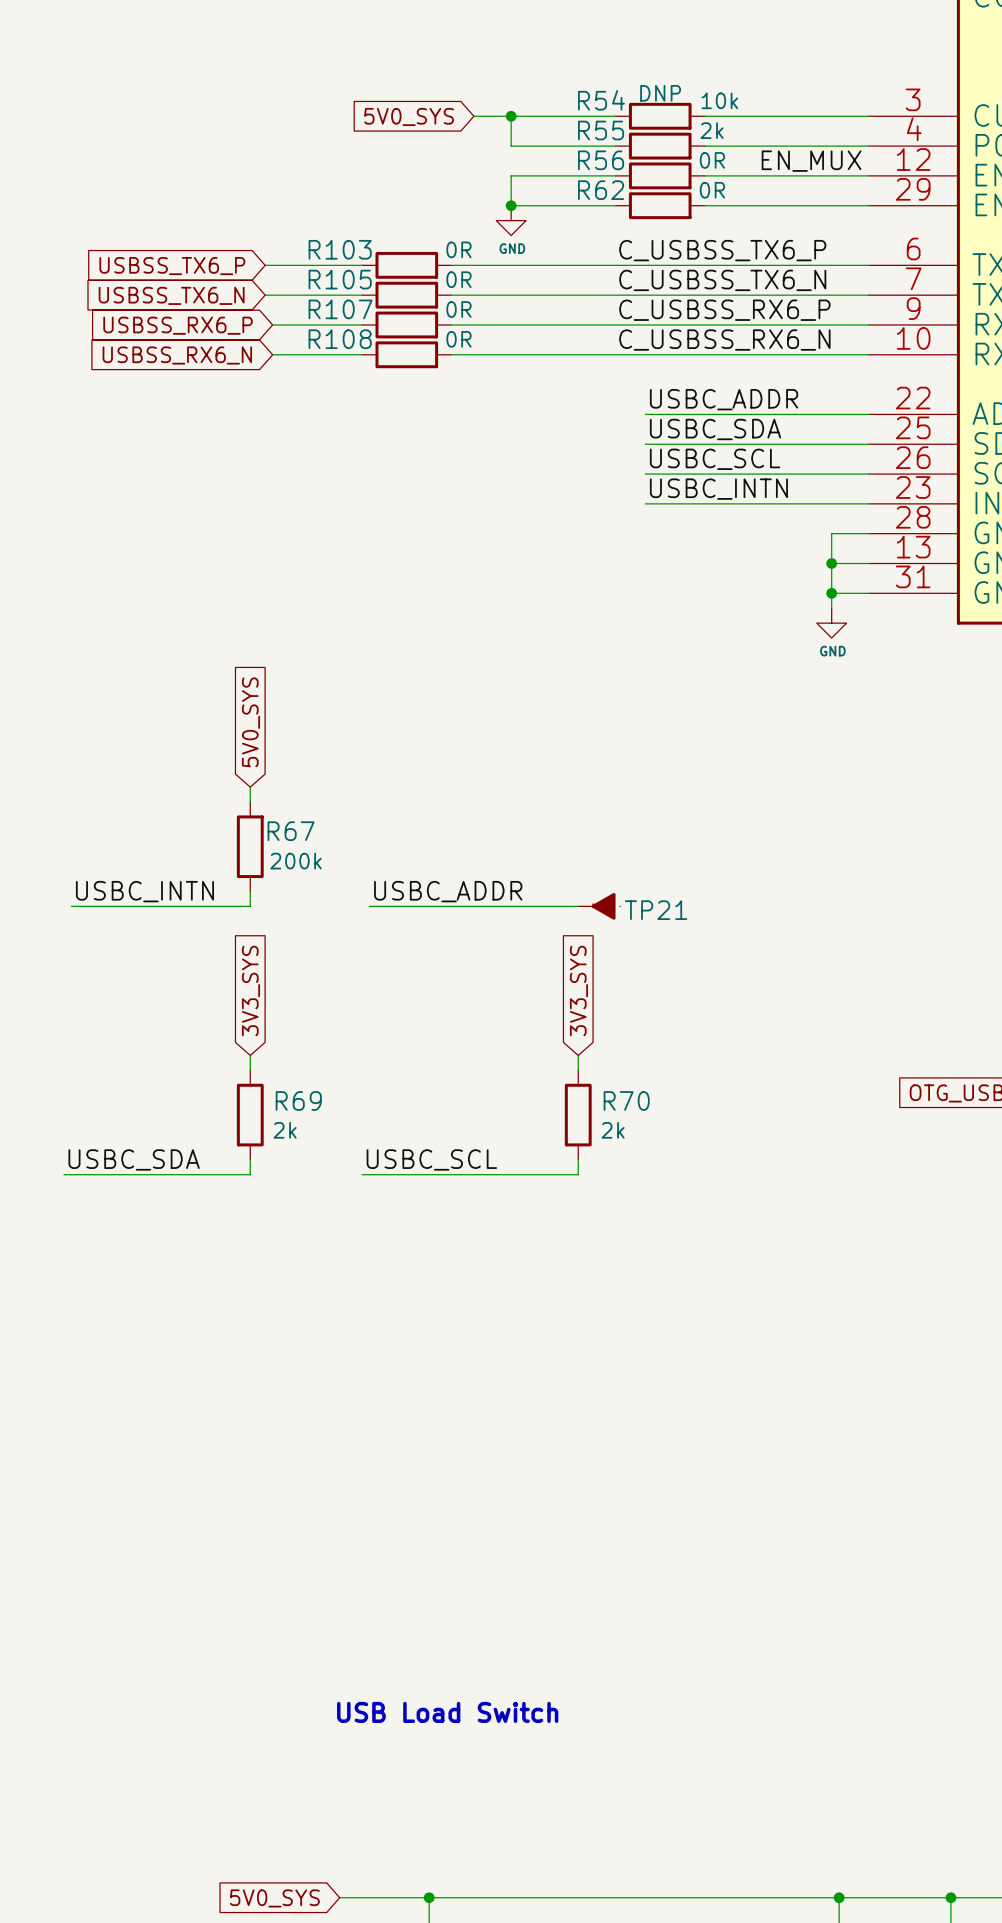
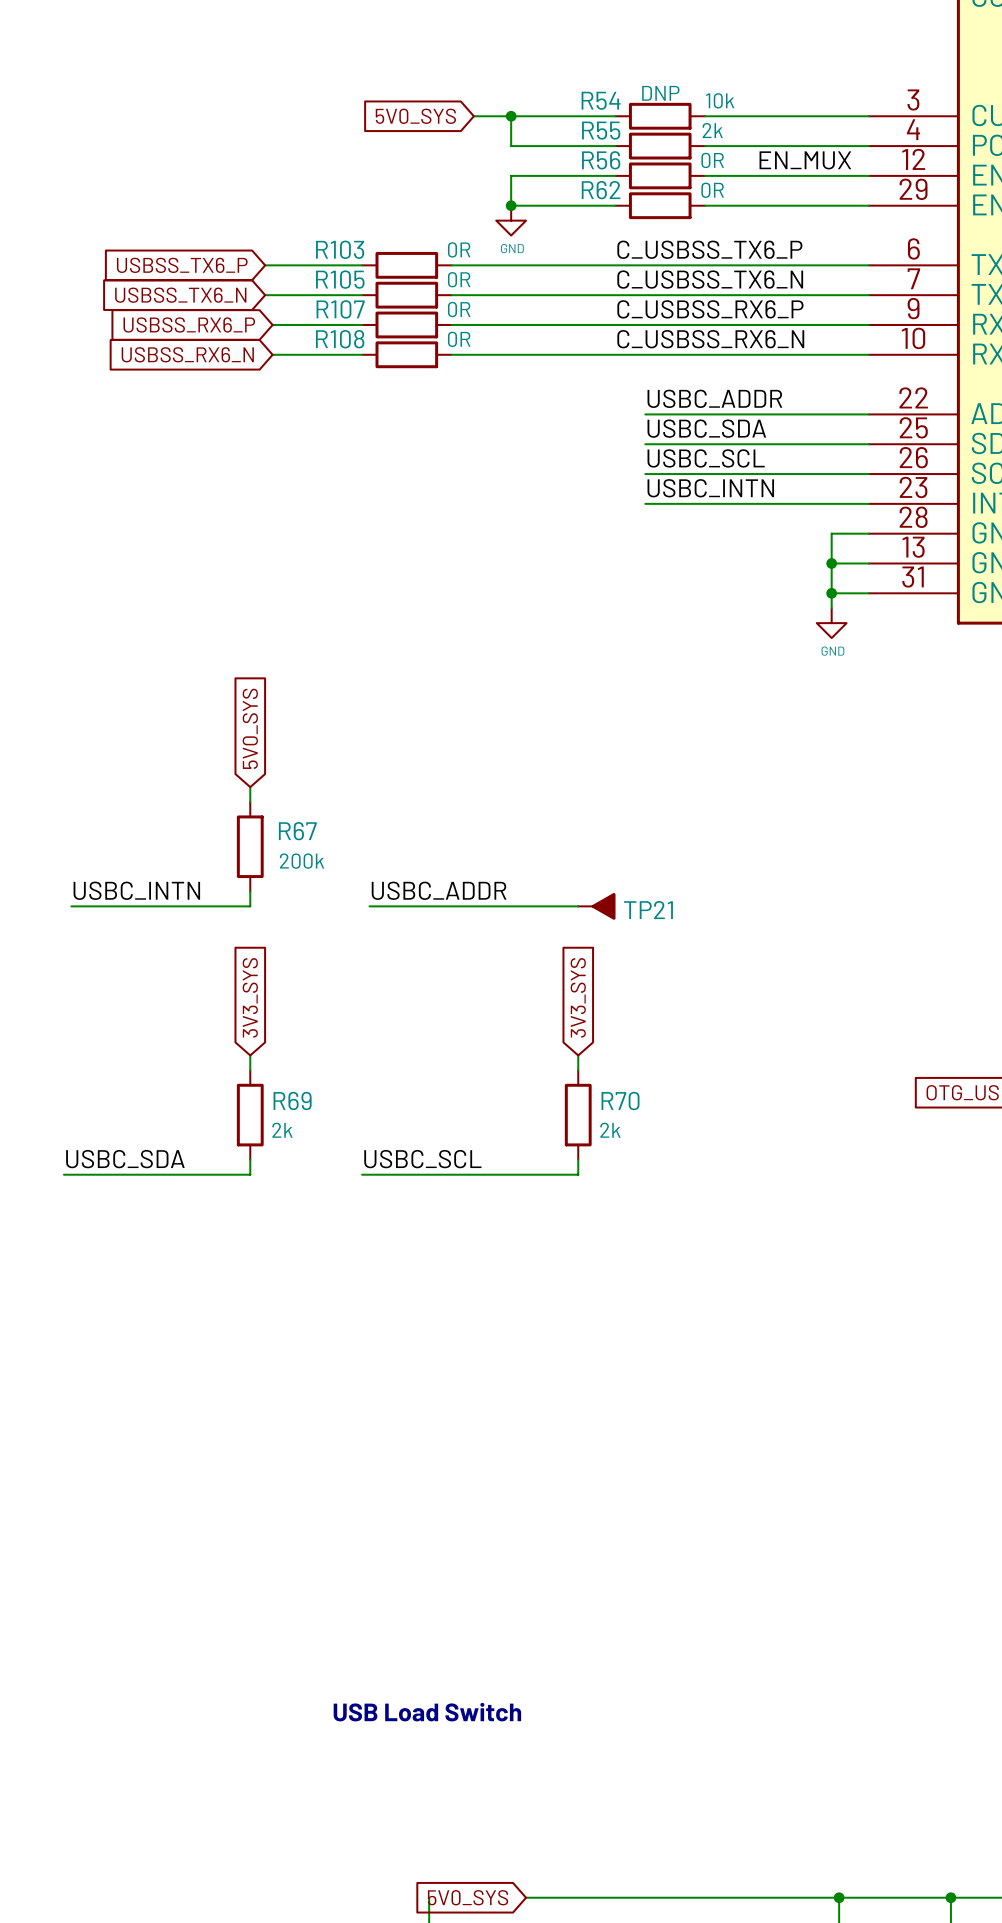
wire: (339, 1897) (526, 1897) -> none
junction: (429, 1897) -> none
global label position: 5V0_SYS (274, 1898) -> 5V0_SYS (468, 1897)

